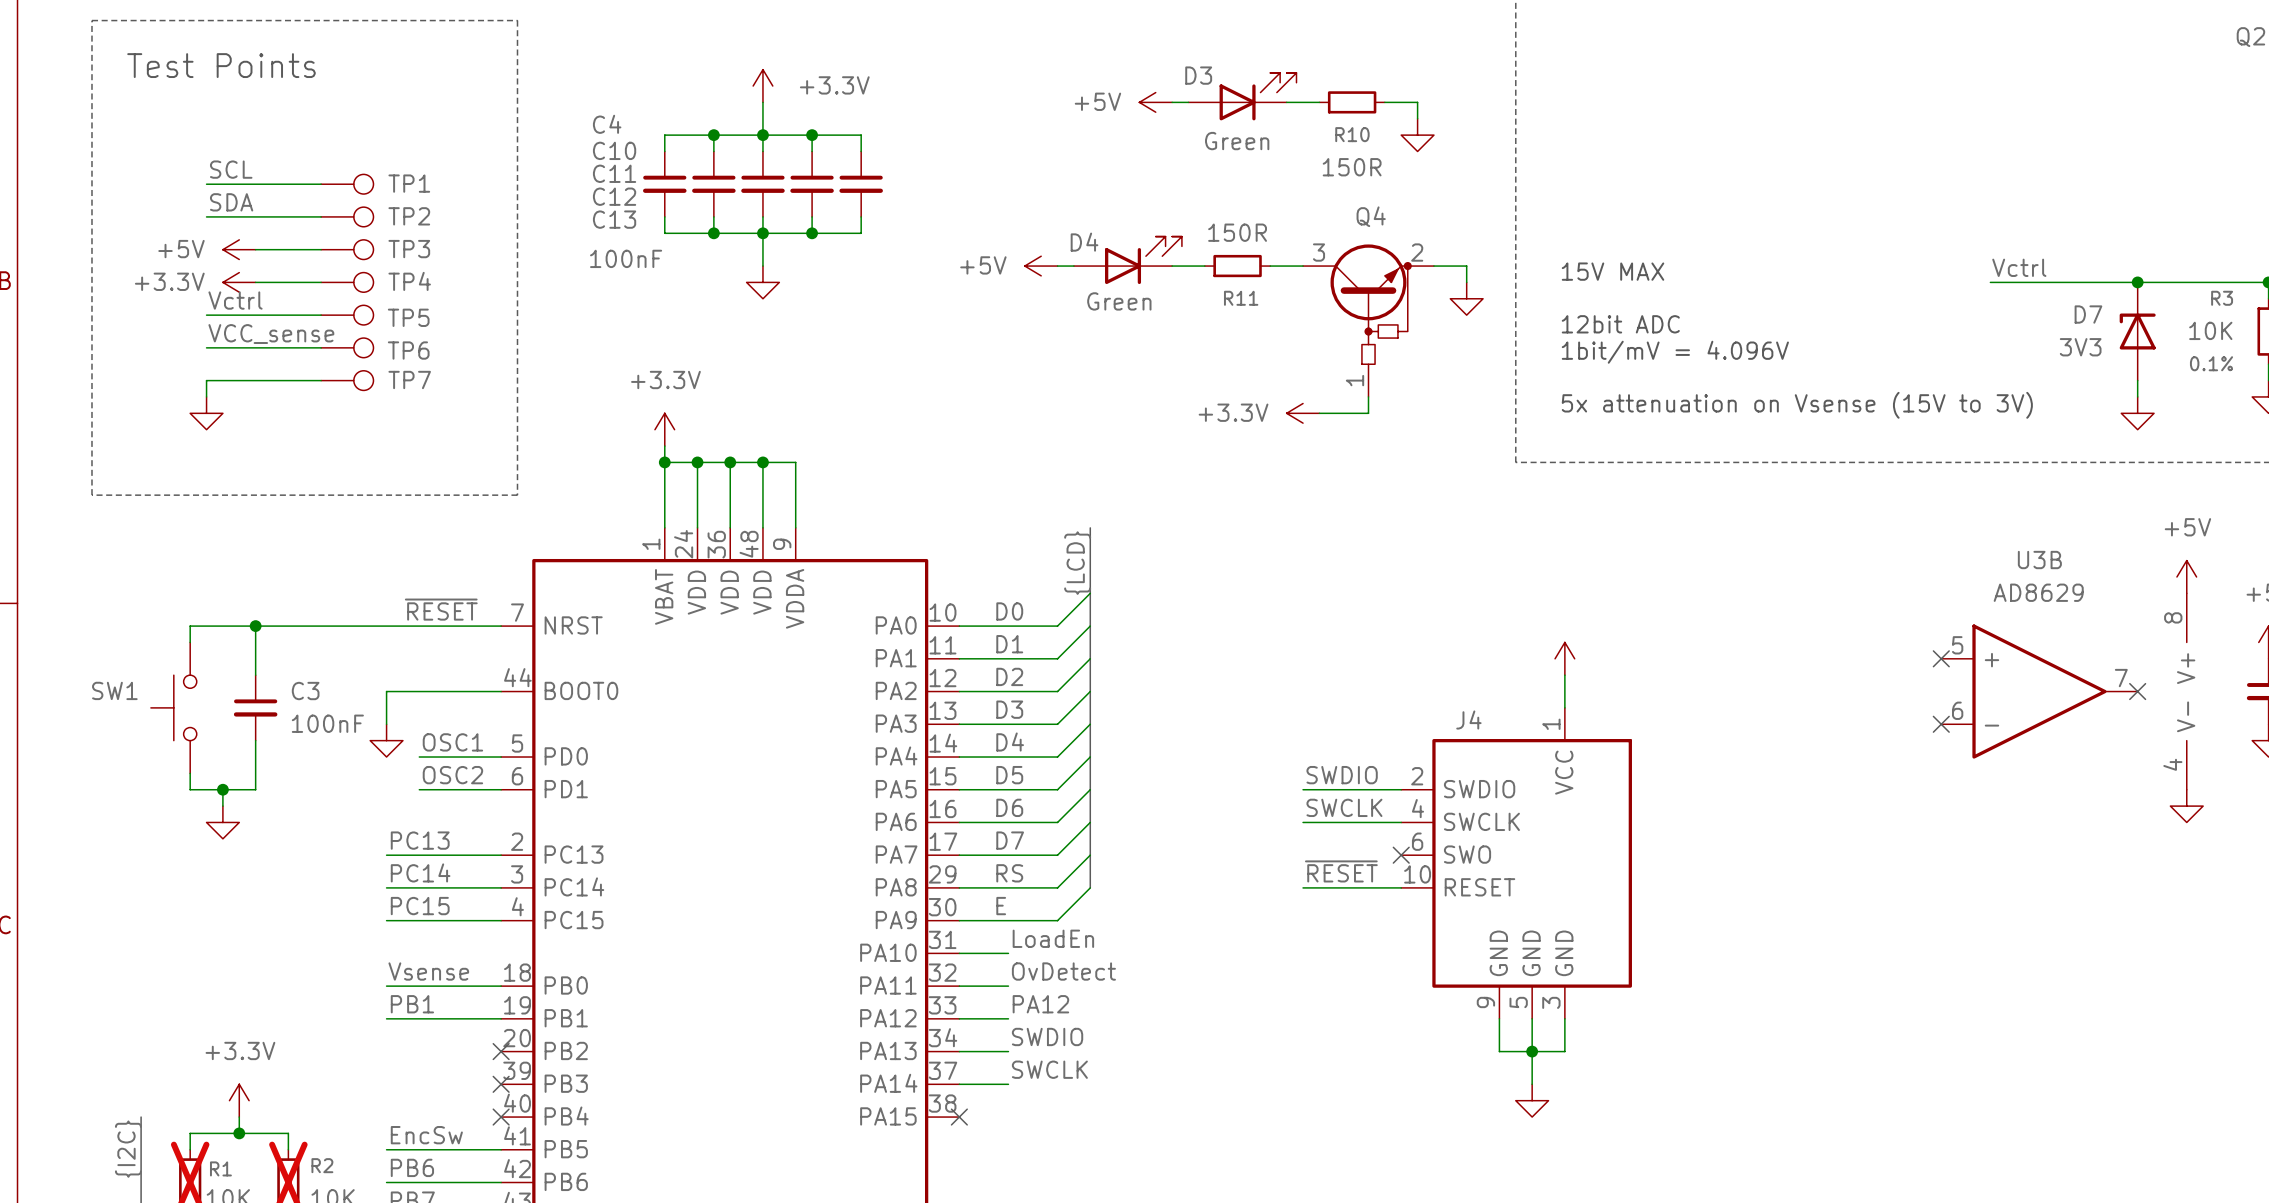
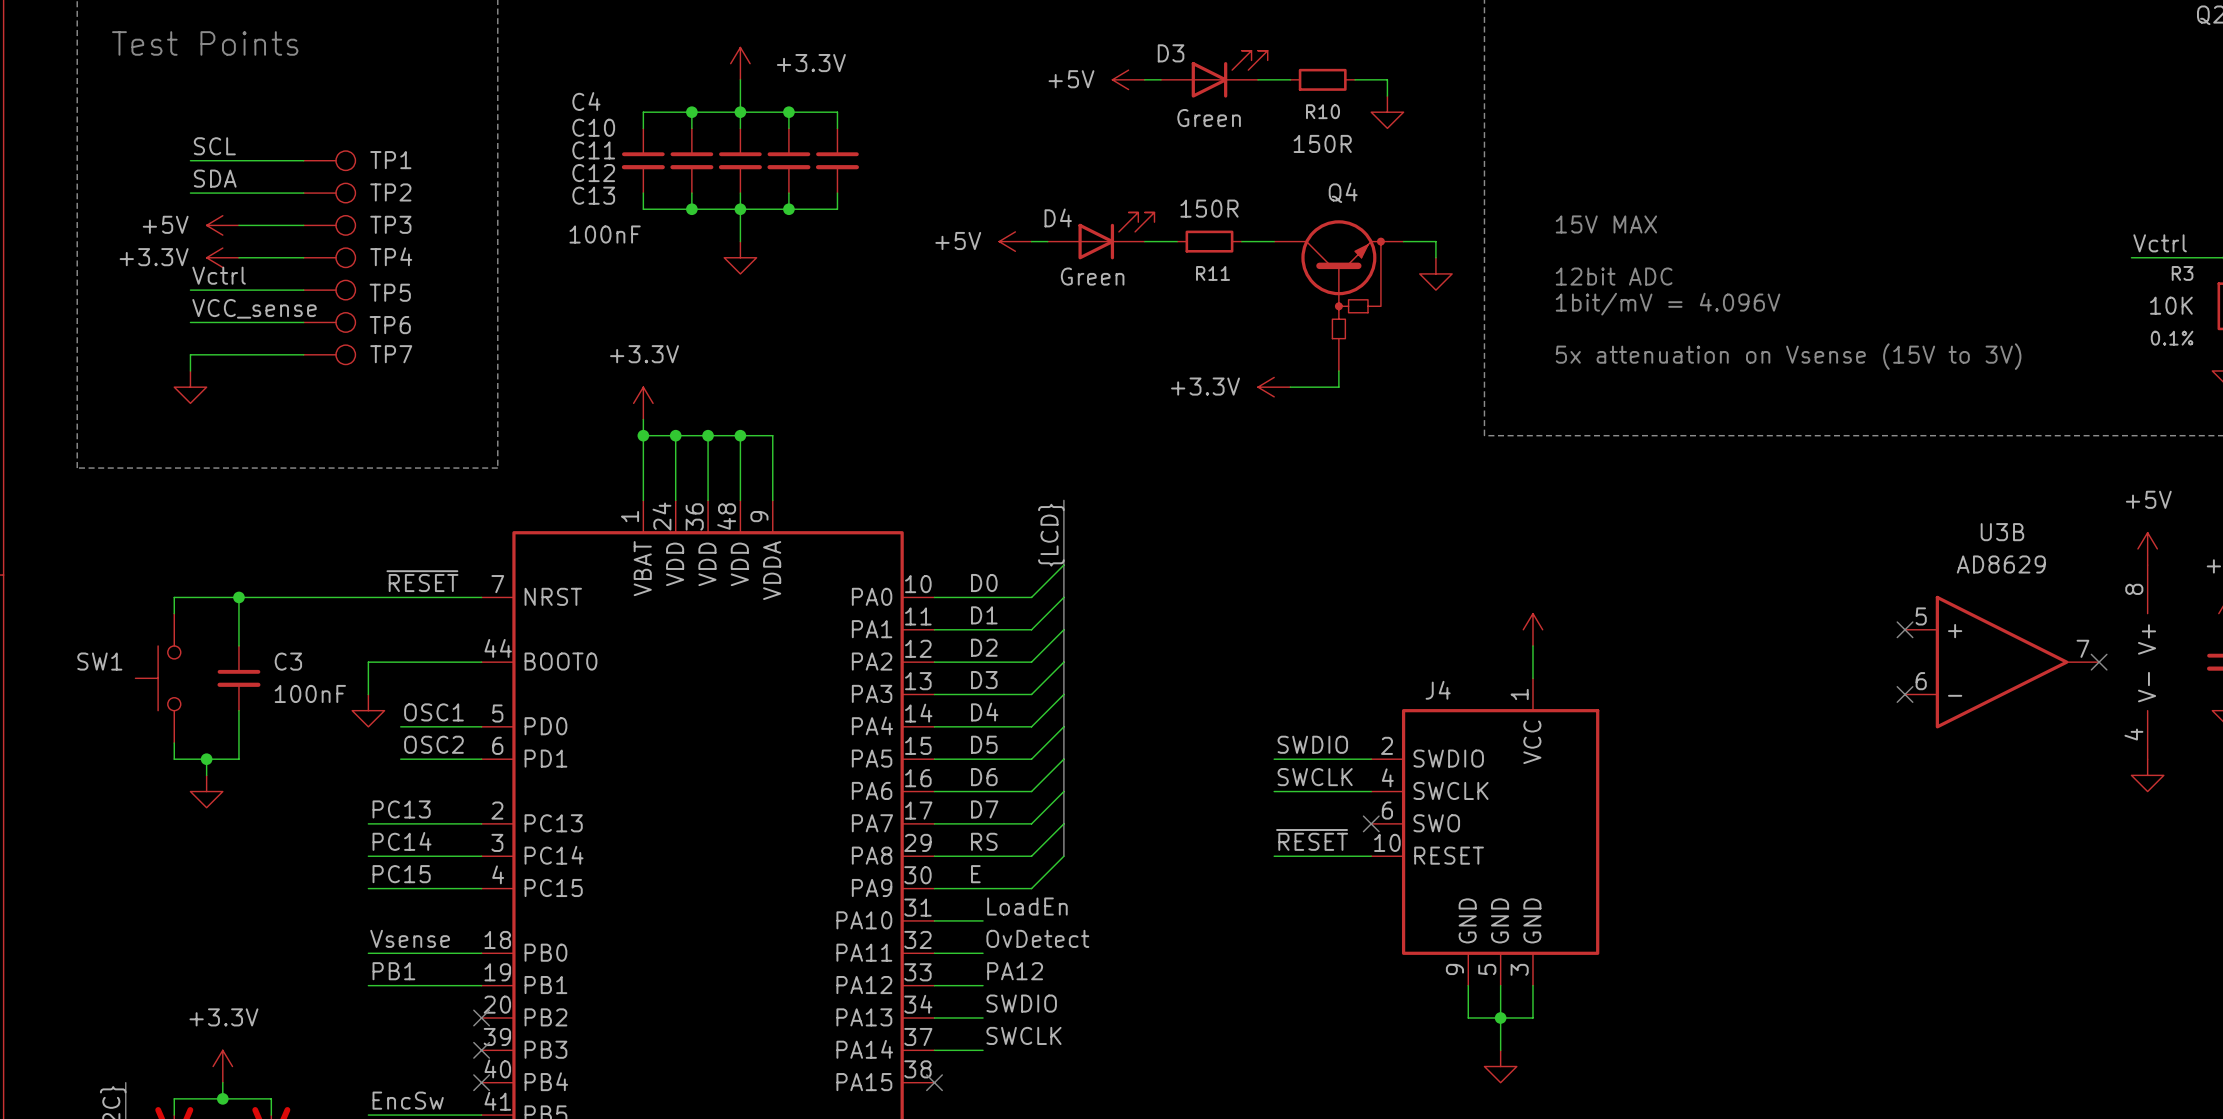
Q4 symbol: [1303, 244, 1434, 397] -> [1274, 220, 1404, 371]
label position: Vctrl (2019, 267) -> Vctrl (2160, 243)
text position: 15V MAX (1613, 271) -> 15V MAX (1606, 224)
wire: (1990, 282) (2170, 282) -> none
junction: (2137, 282) -> none
text position: 12bit ADC (1620, 324) -> 12bit ADC (1614, 276)
D7: (2137, 331) -> none
text position: 1bit/mV = 4.096V (1675, 352) -> 1bit/mV = 4.096V (1668, 304)
wire: (2137, 380) (2137, 396) -> none
text position: 5x attenuation on Vsense (15V to 3V) (1797, 405) -> 5x attenuation on Vsense (15V to 3V) (1788, 356)
power symbol: (2137, 413) -> none

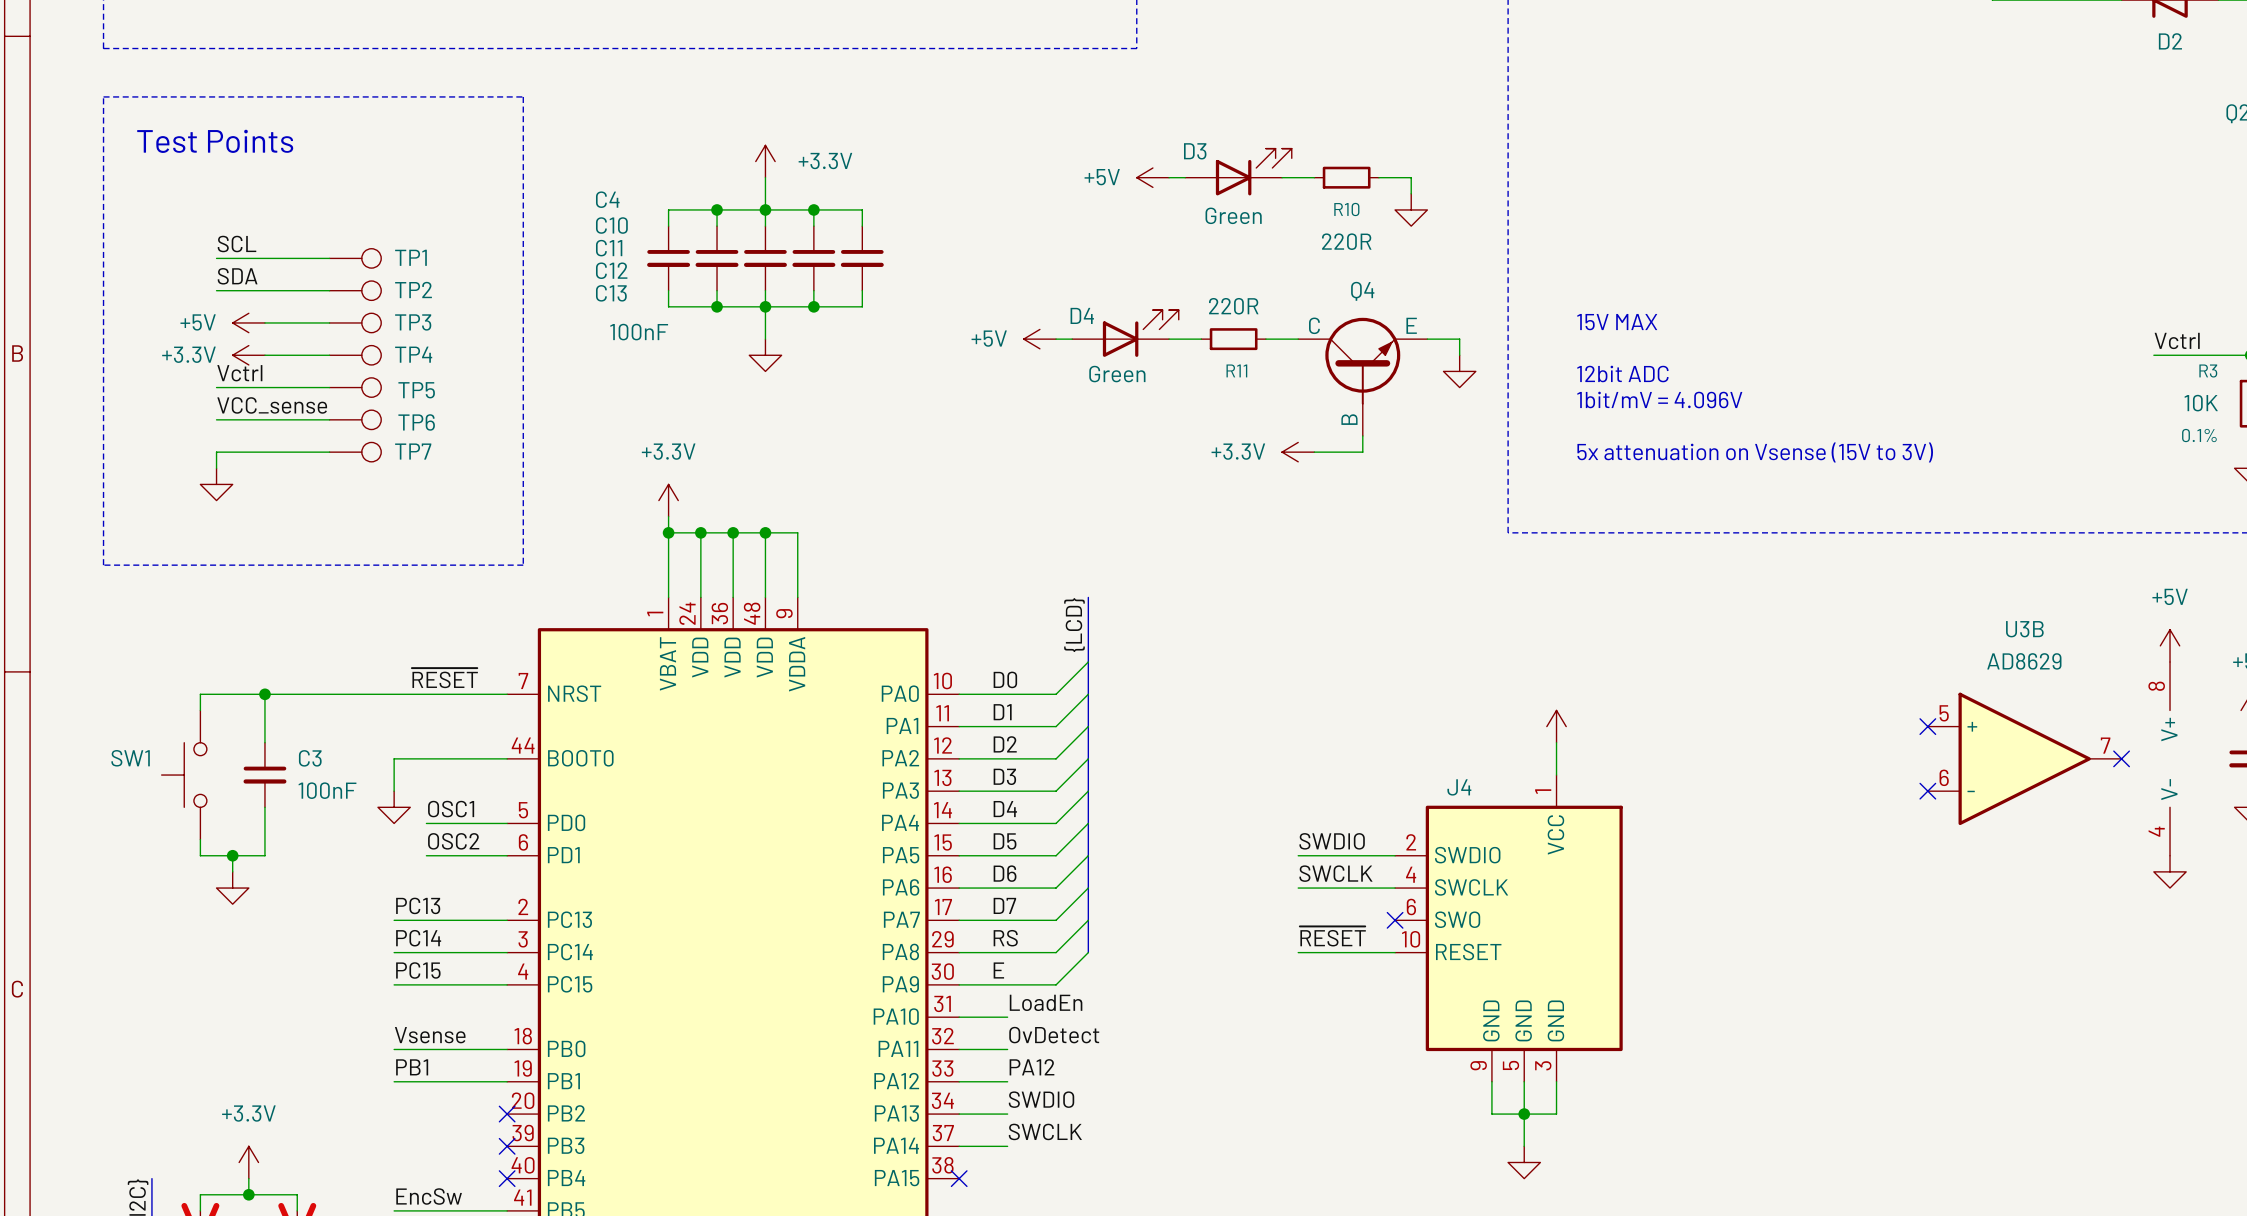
R10 value: 150R (1322, 143) -> 220R (1346, 241)
R11 value: 150R (1209, 208) -> 220R (1233, 306)
Q4 symbol: [1274, 220, 1404, 371] -> [1298, 317, 1428, 436]
wire: (1338, 370) (1338, 387) (1290, 387) -> (1362, 435) (1362, 452) (1314, 452)
power symbol position: +3.3V (1274, 387) -> +3.3V (1298, 452)

